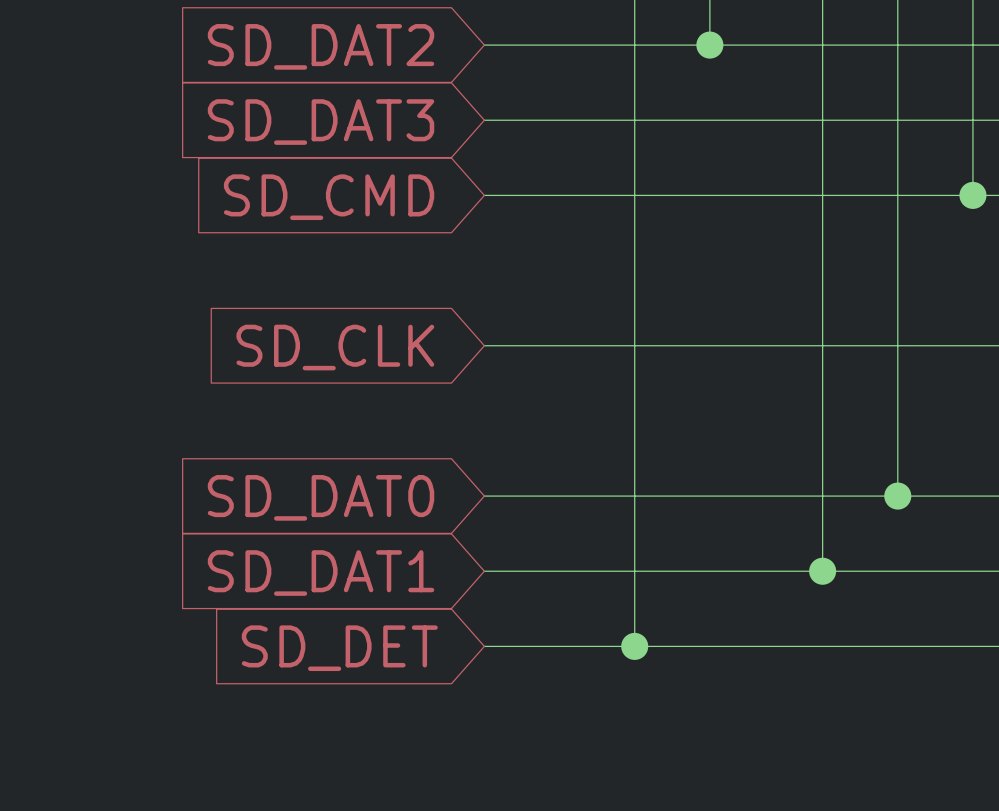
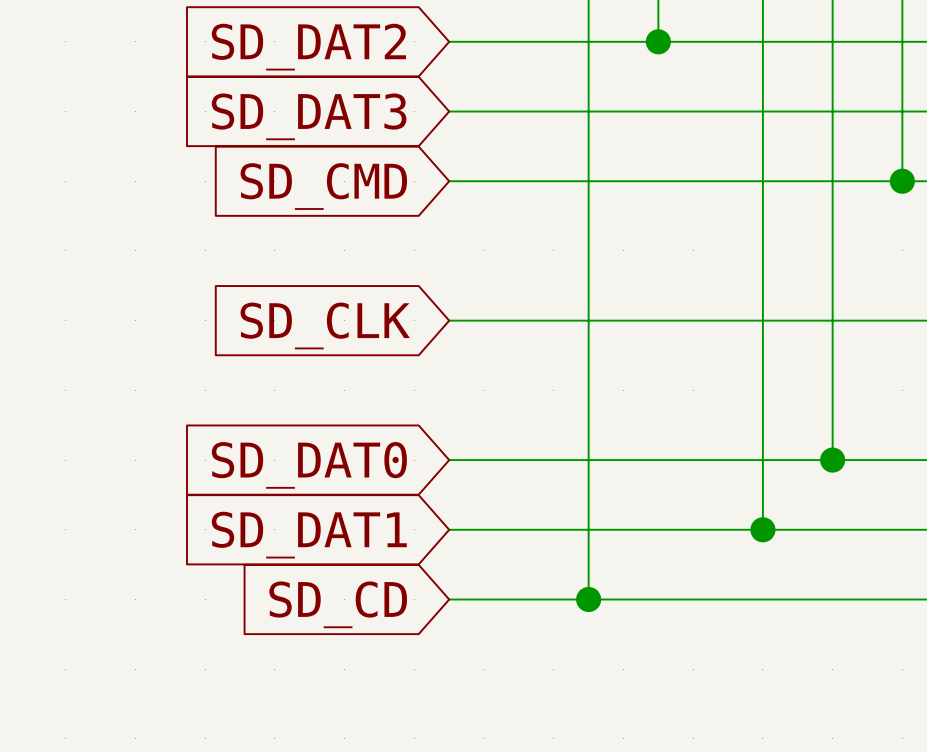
global label: SD_DET (339, 648) -> SD_CD (338, 604)

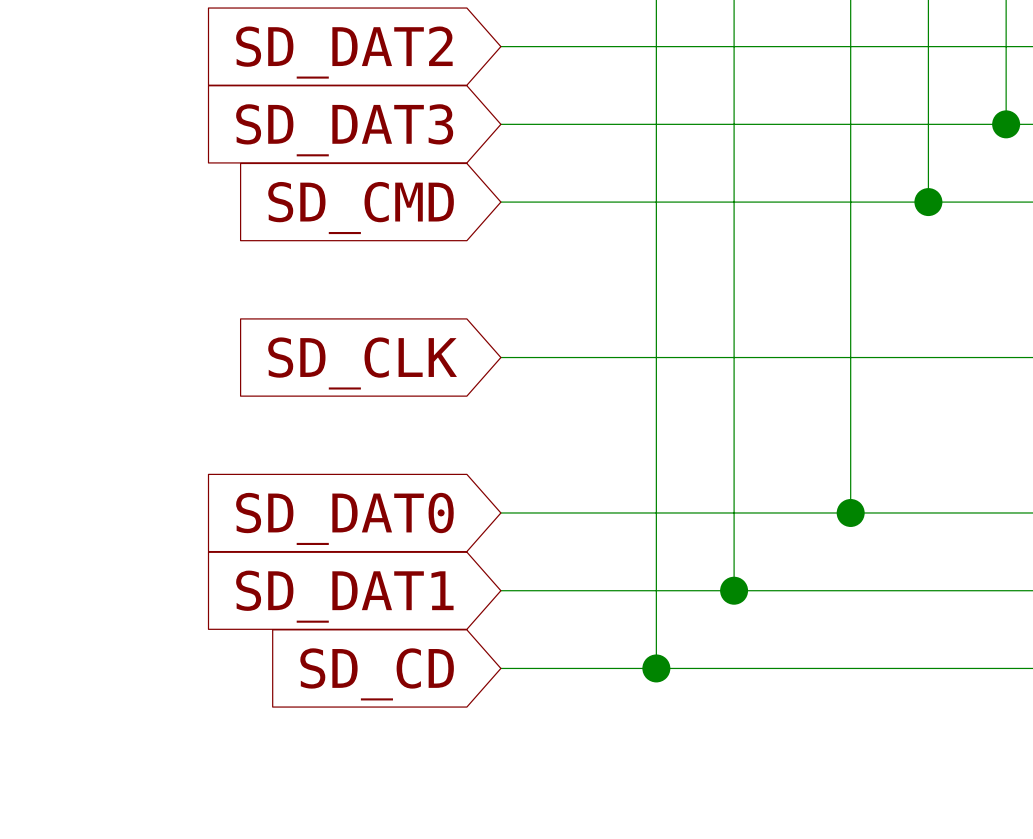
wire: none -> (734, 46) (734, 590)
junction: (658, 41) -> none
wire: (902, 111) (902, 181) -> none
junction: none -> (1006, 124)
wire: (832, 181) (832, 460) -> none
junction: none -> (928, 202)
junction: (902, 181) -> none
wire: (762, 460) (762, 529) -> none
junction: none -> (850, 512)
junction: (832, 460) -> none
junction: none -> (734, 590)
junction: (762, 529) -> none

